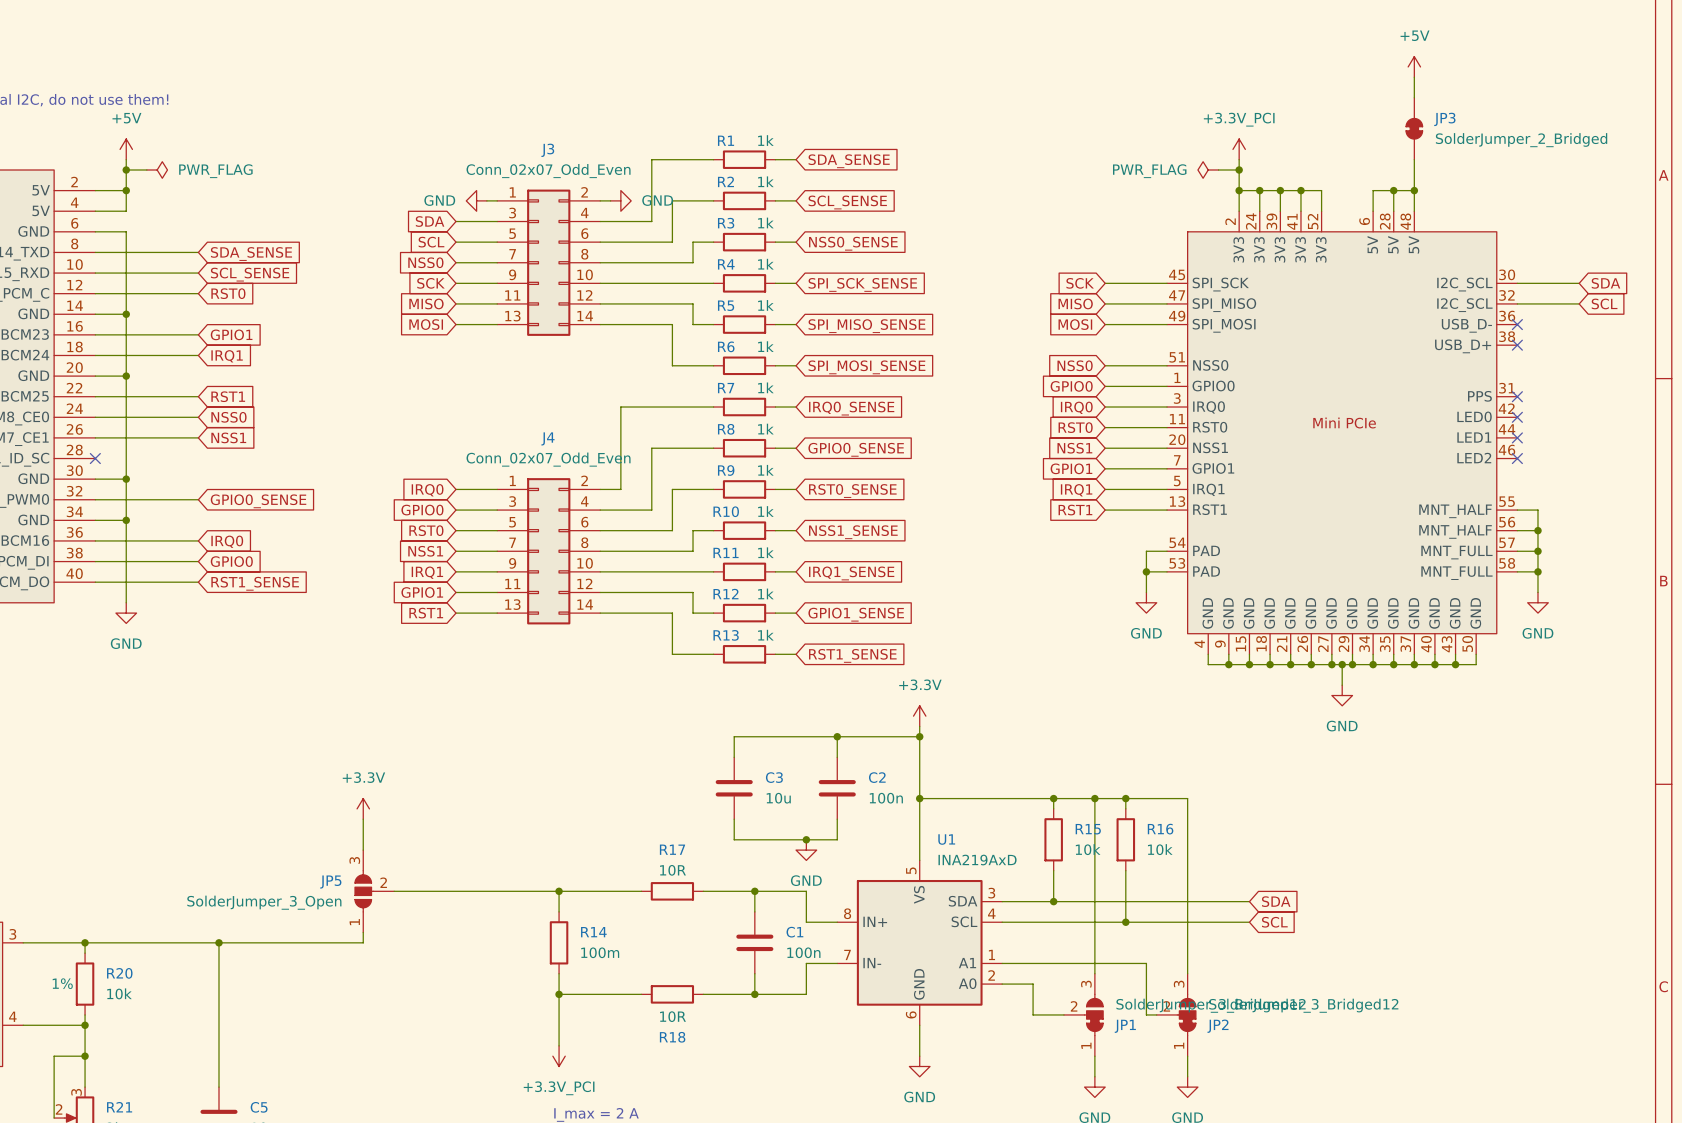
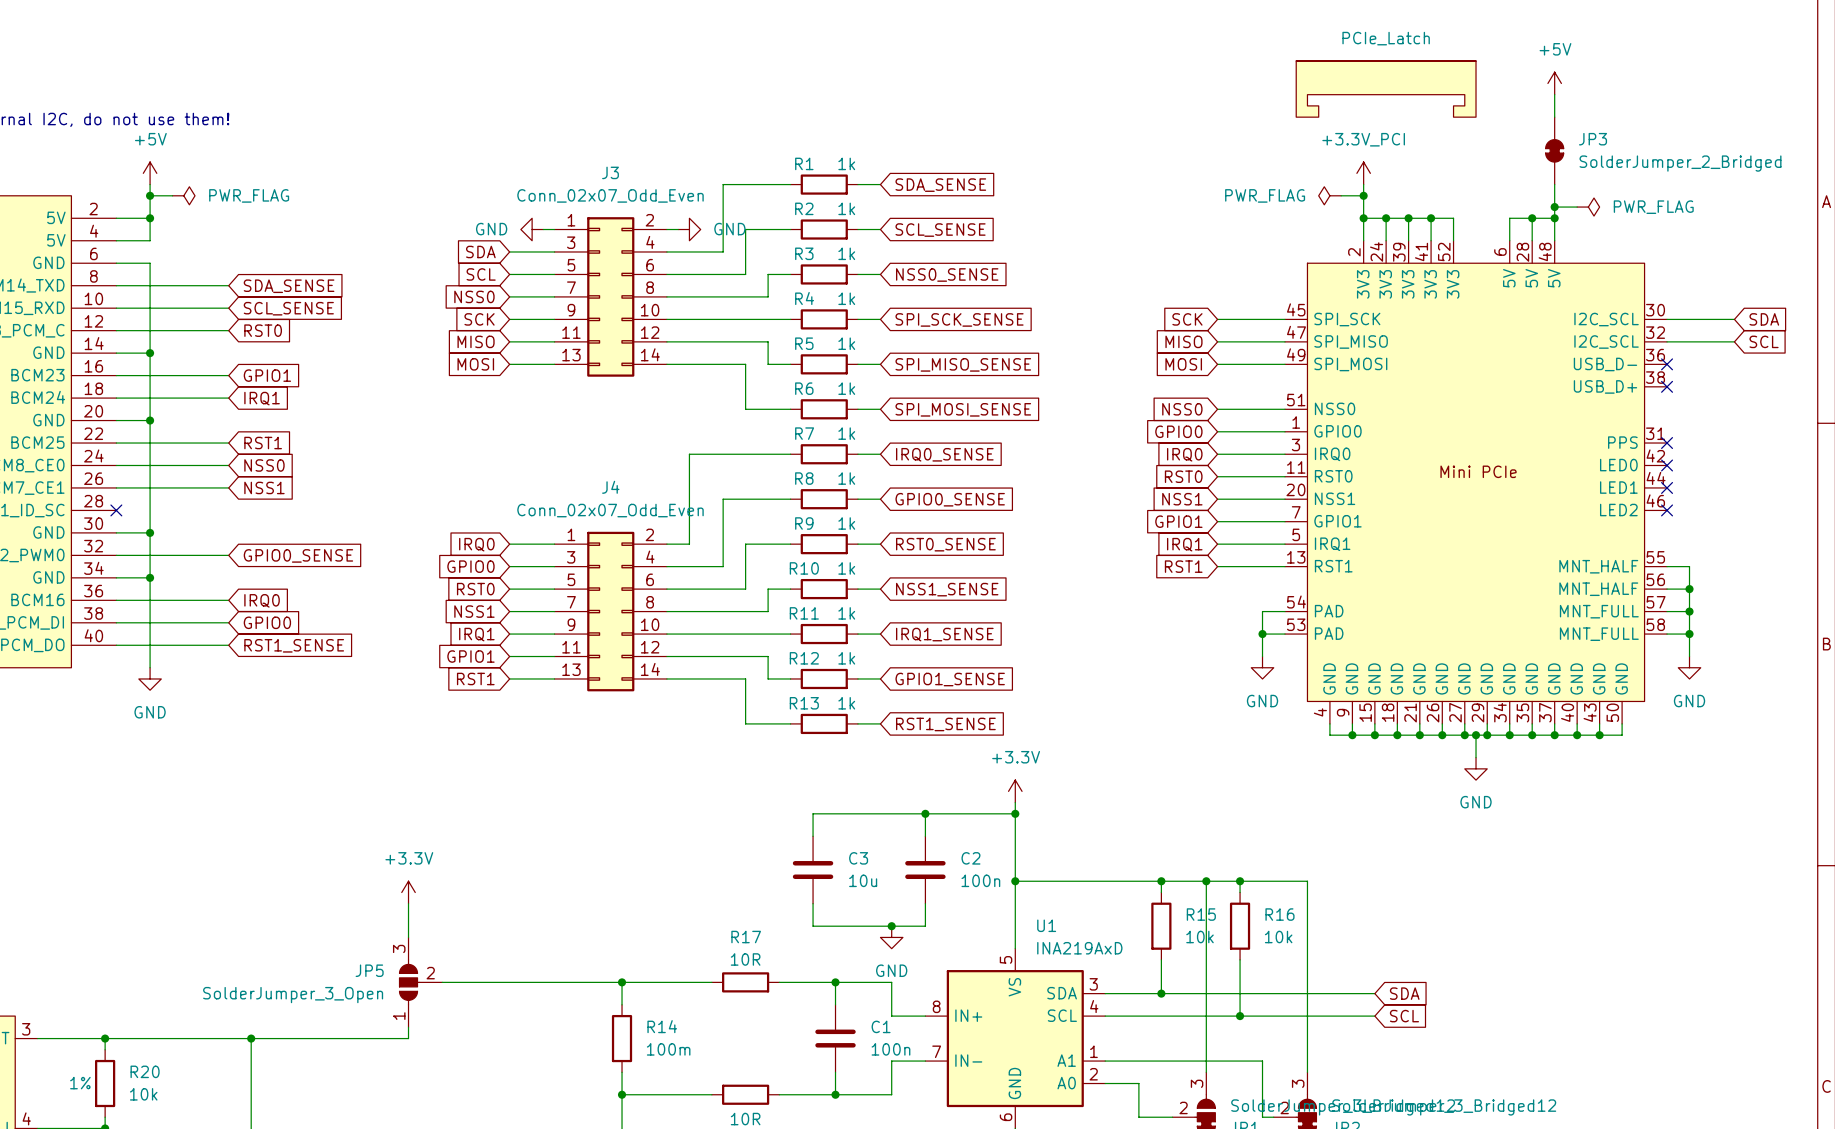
part: none -> PCIe_Latch (1386, 89)
wire: none -> (1554, 207) (1577, 207)
junction: none -> (1554, 207)
power symbol: none -> PWR_FLAG (1588, 207)

